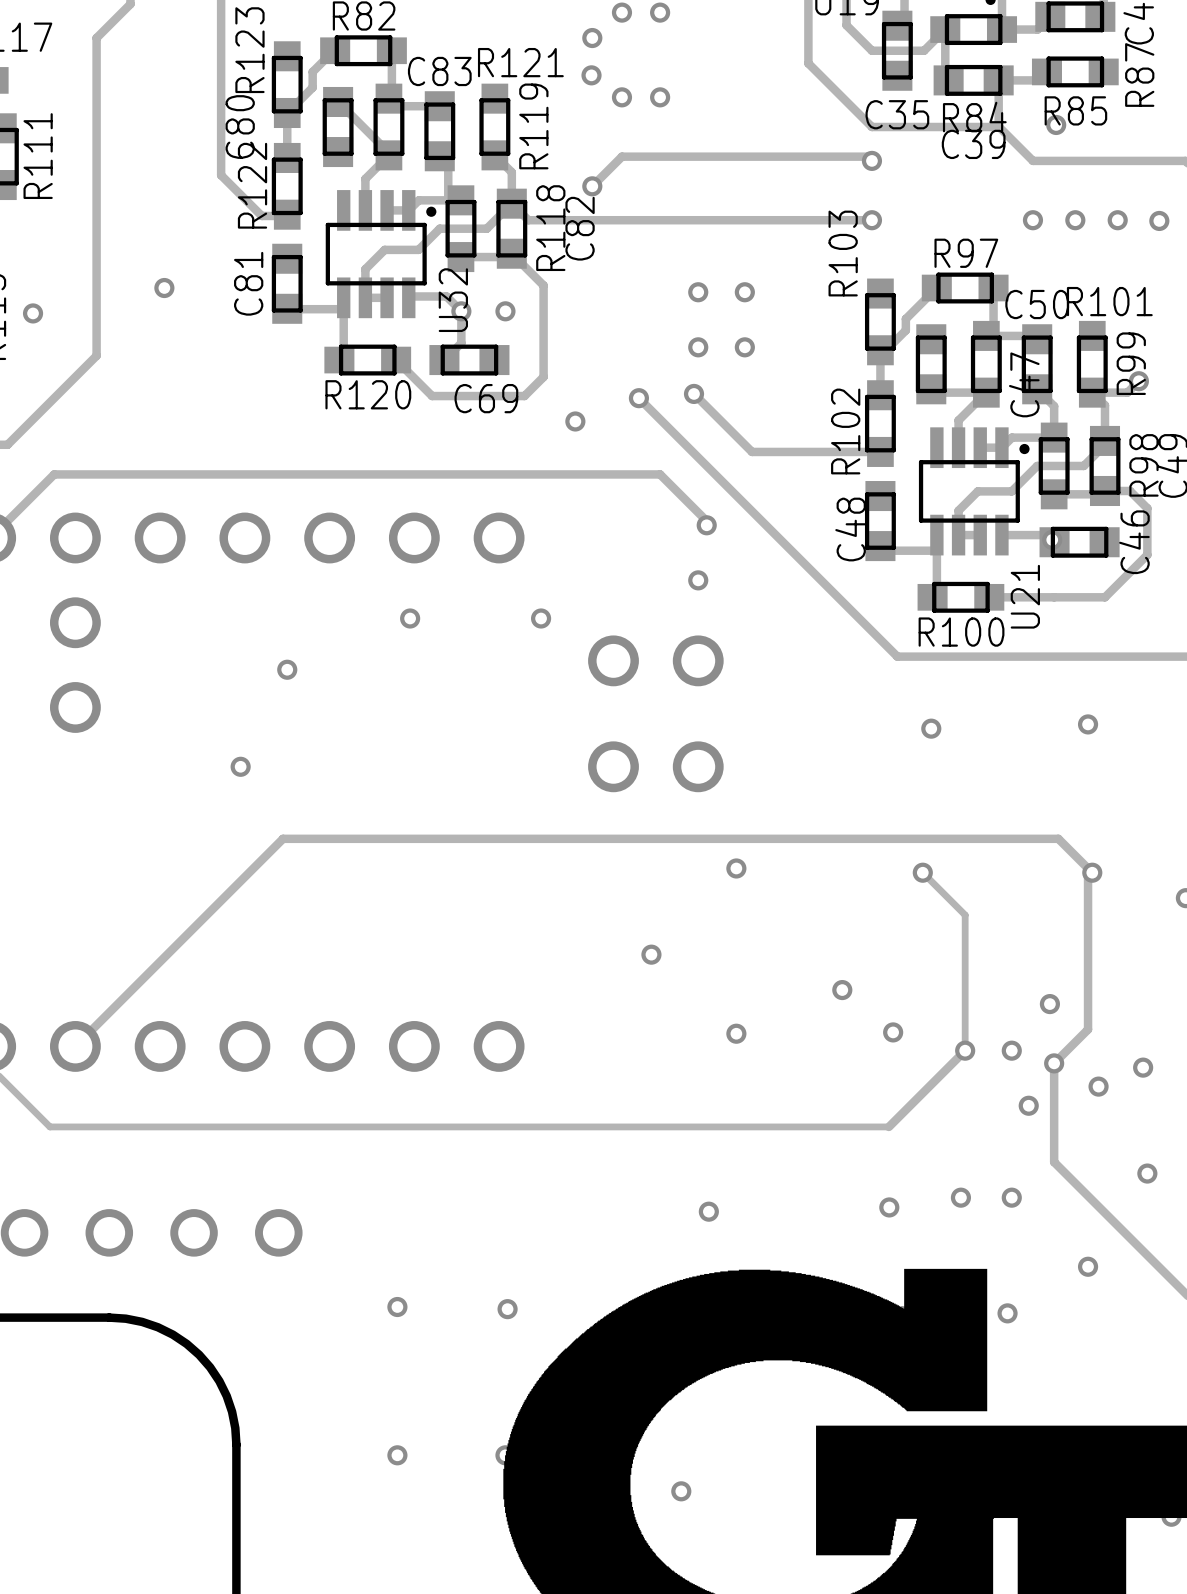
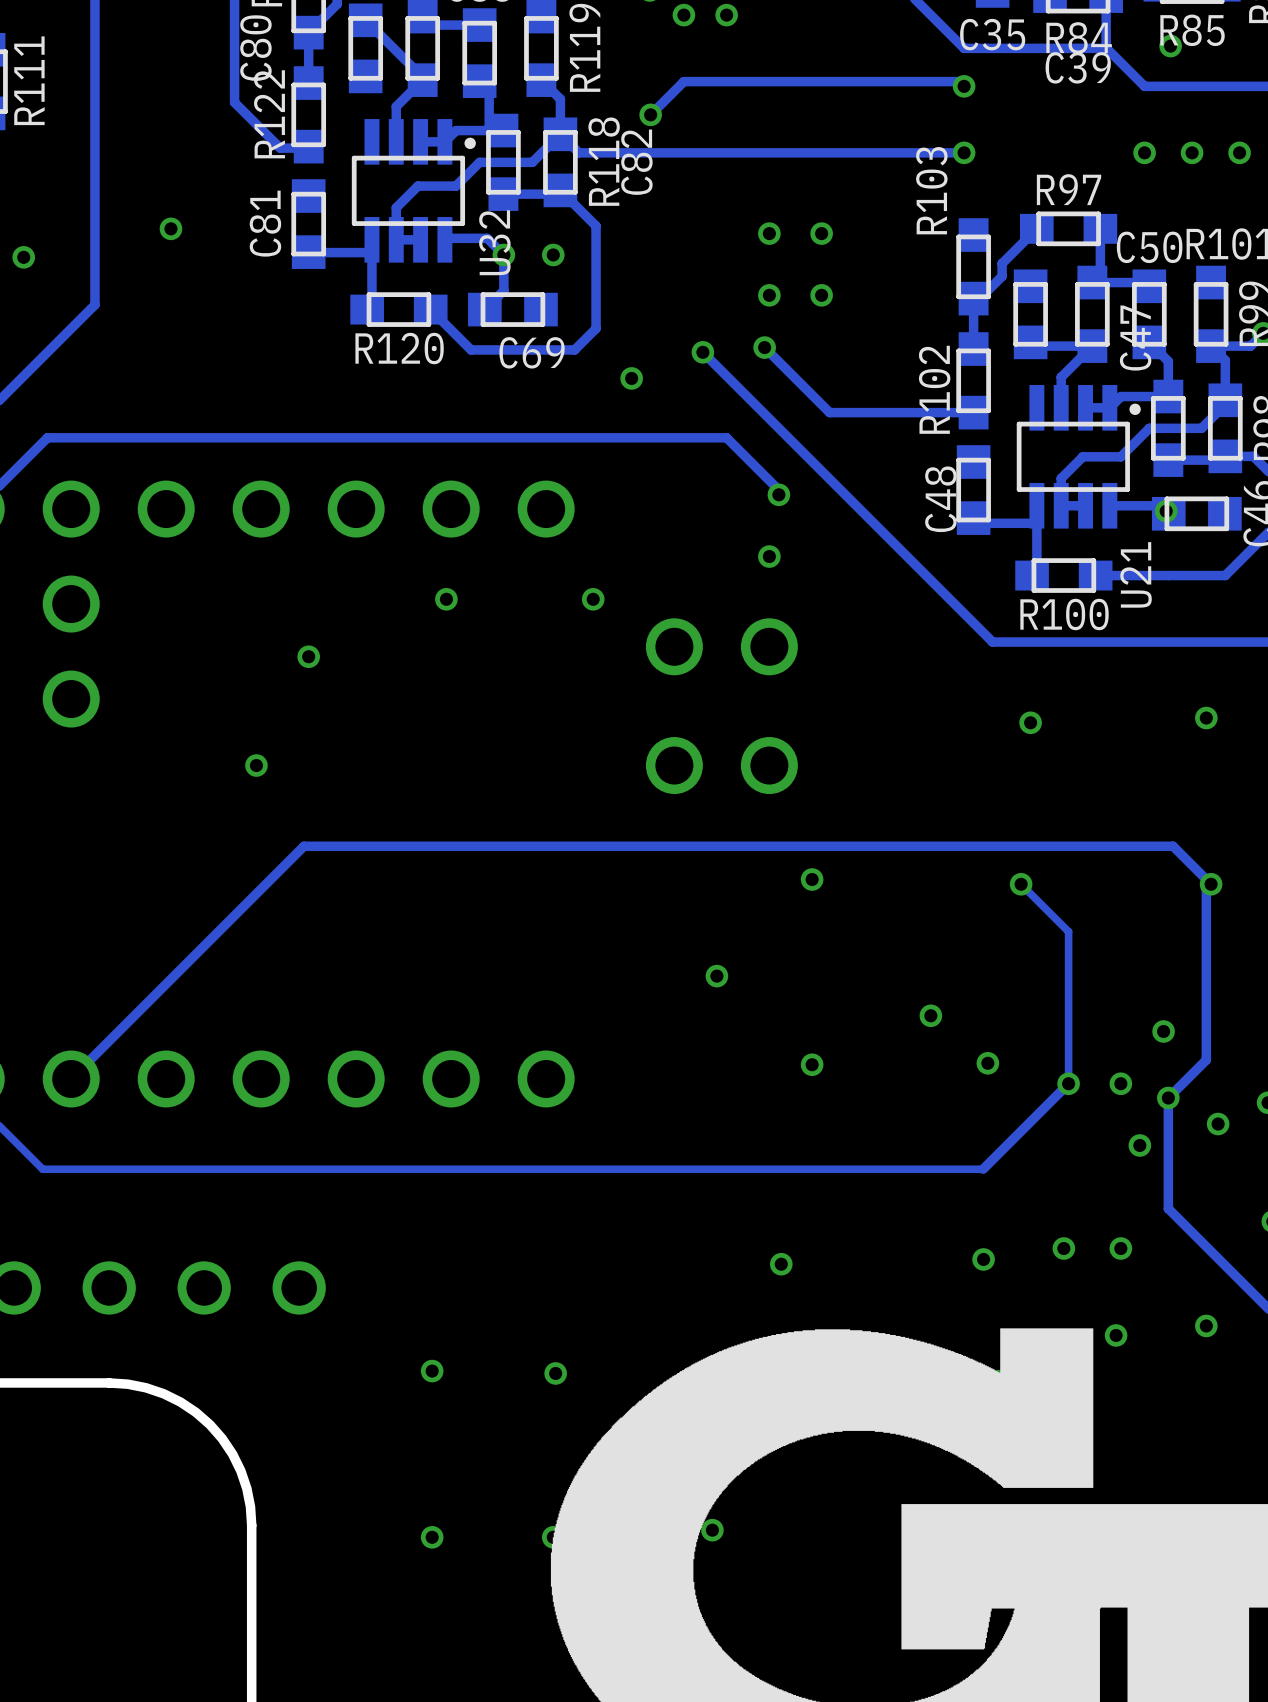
via position: (1007, 1313) -> (1116, 1335)
via position: (681, 1491) -> (712, 1530)

